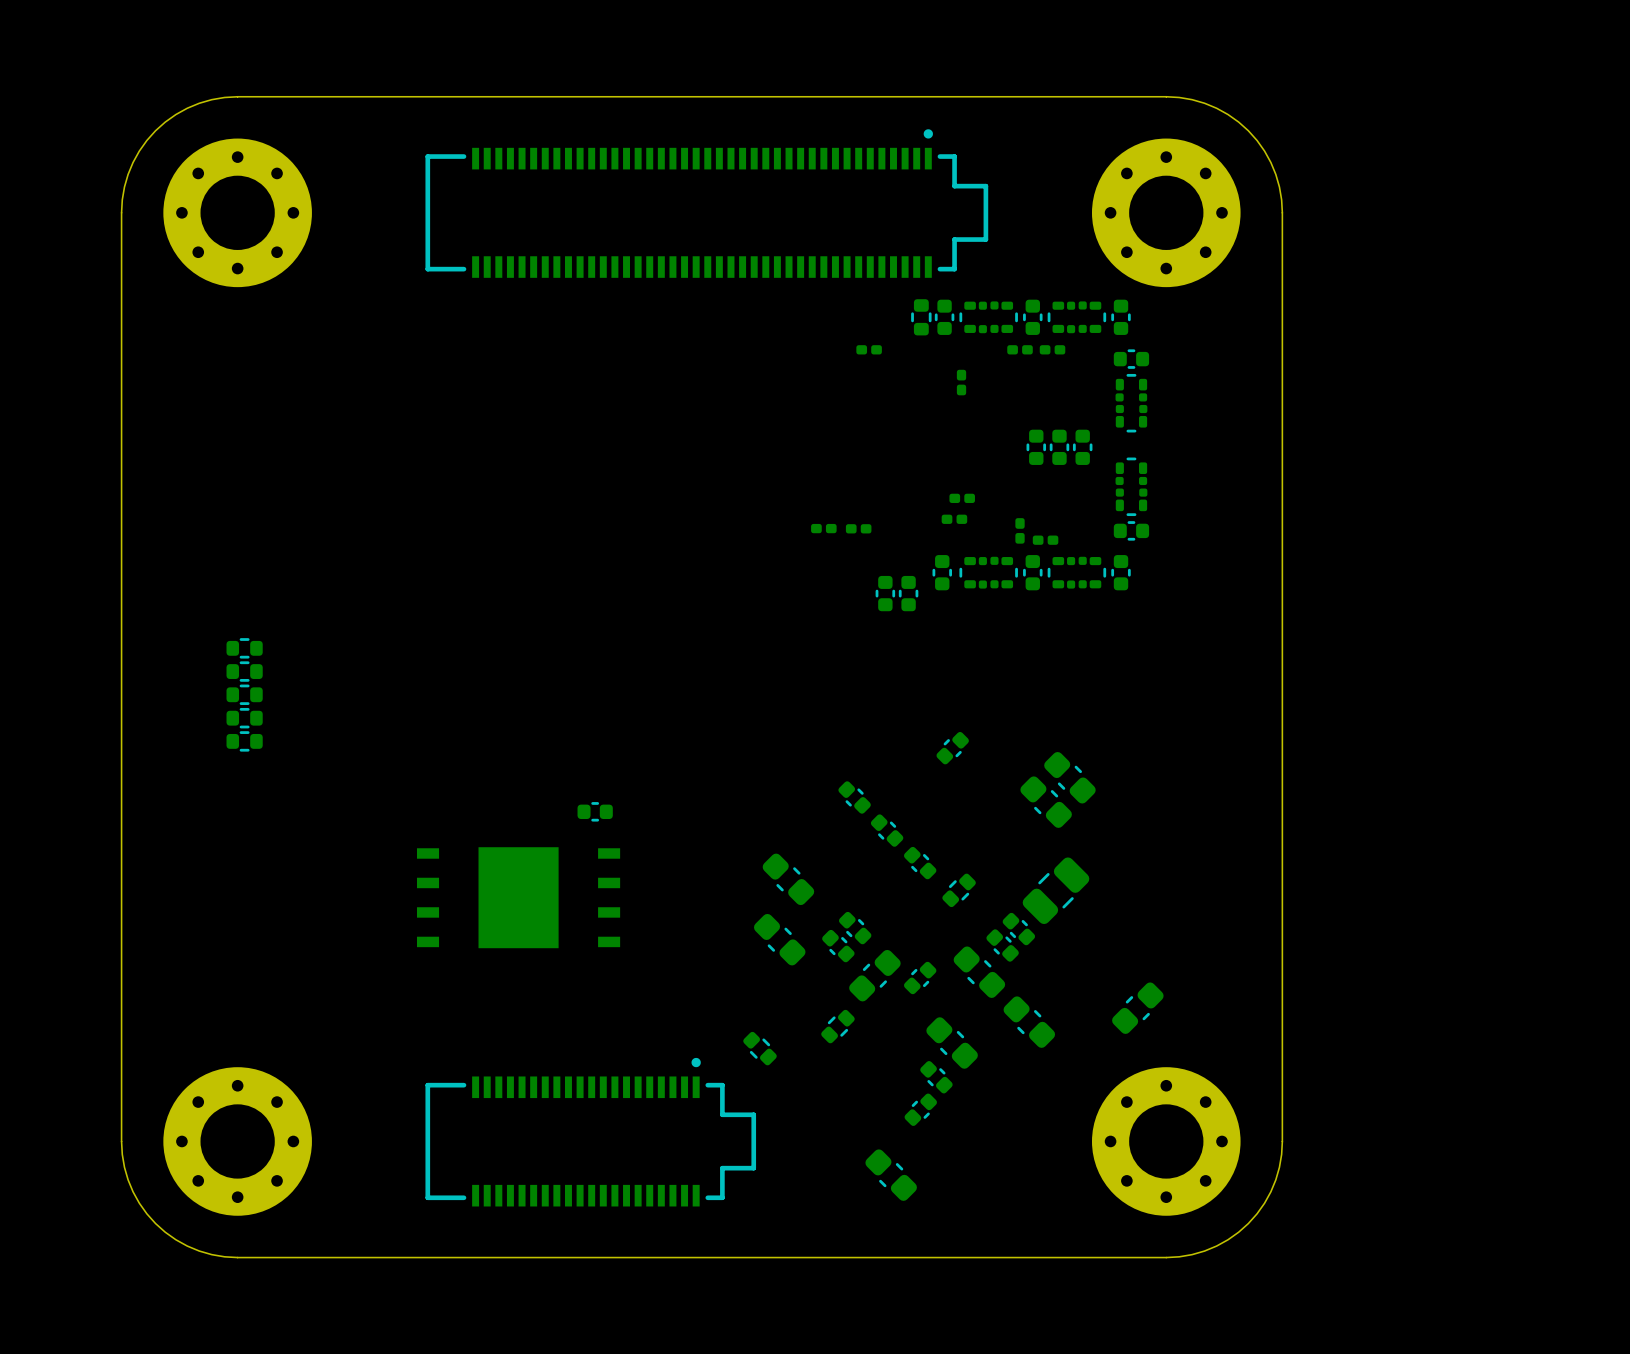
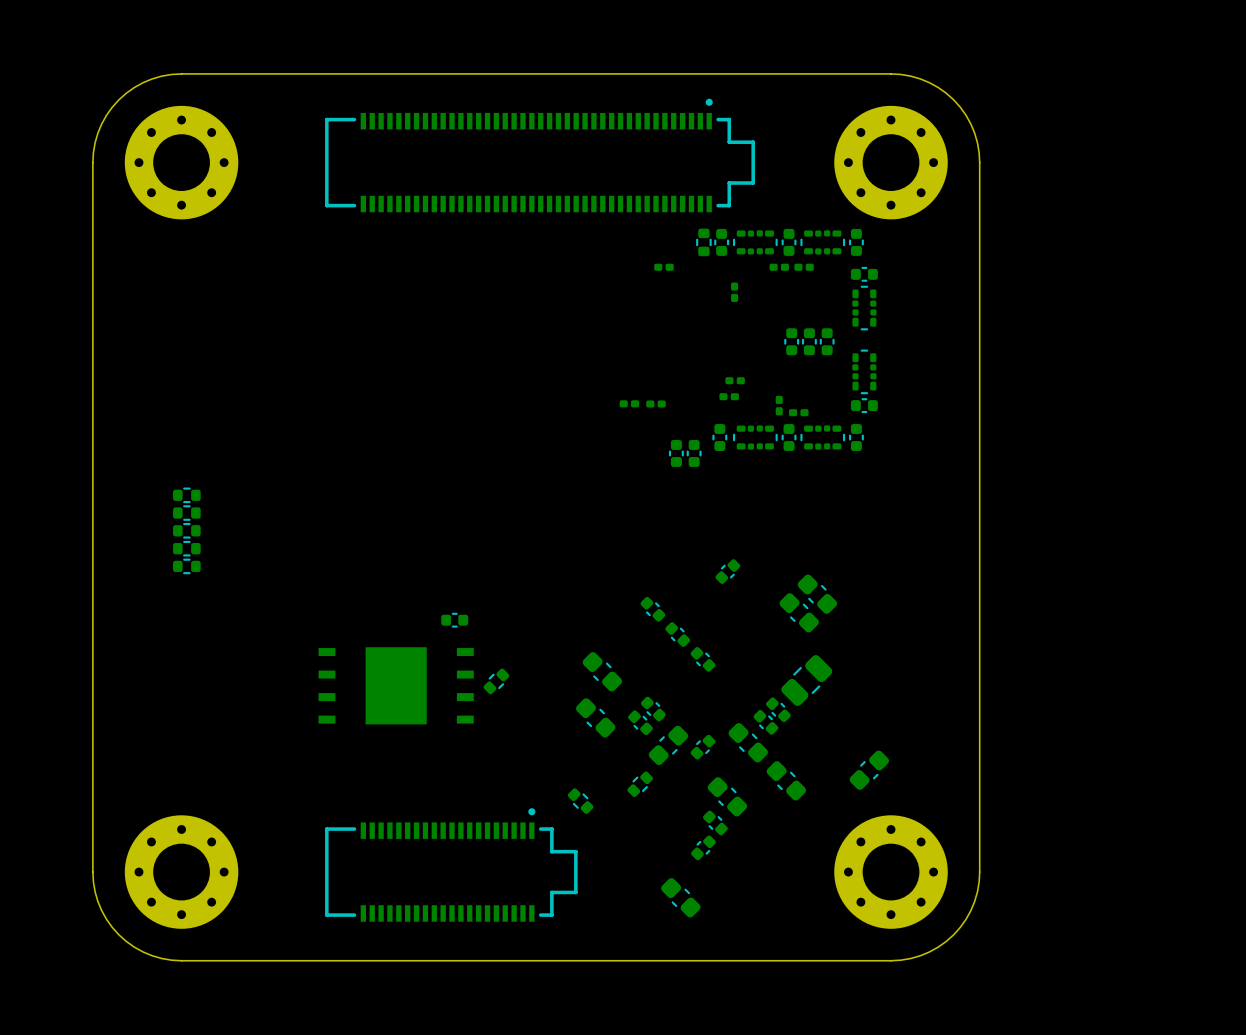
part position: (959, 890) -> (496, 681)

